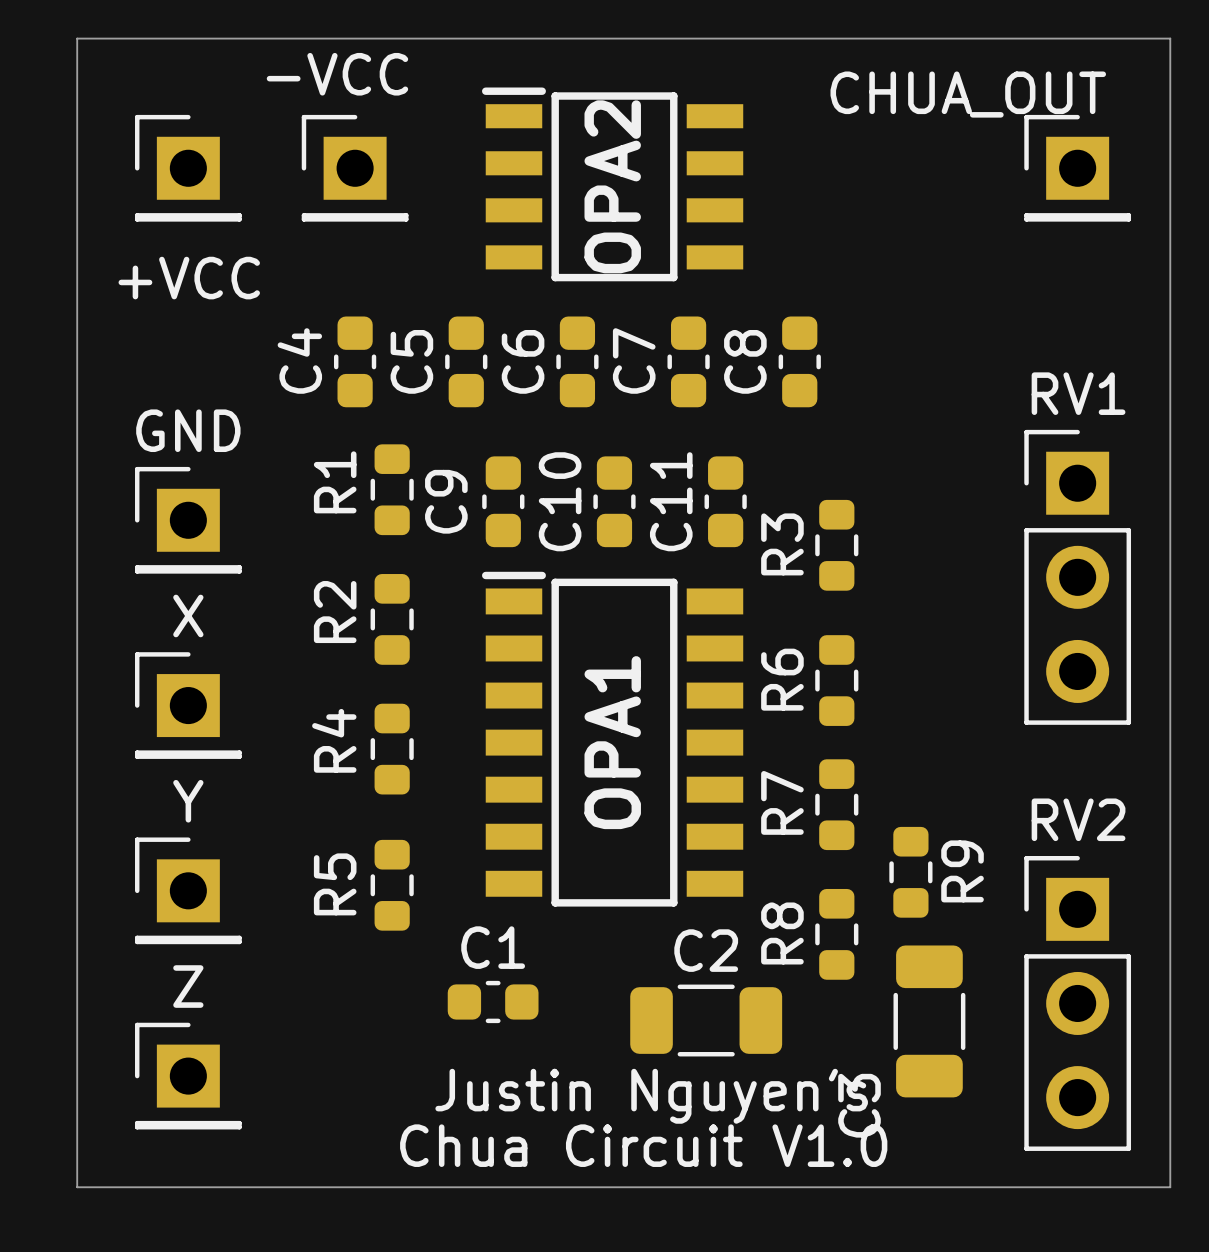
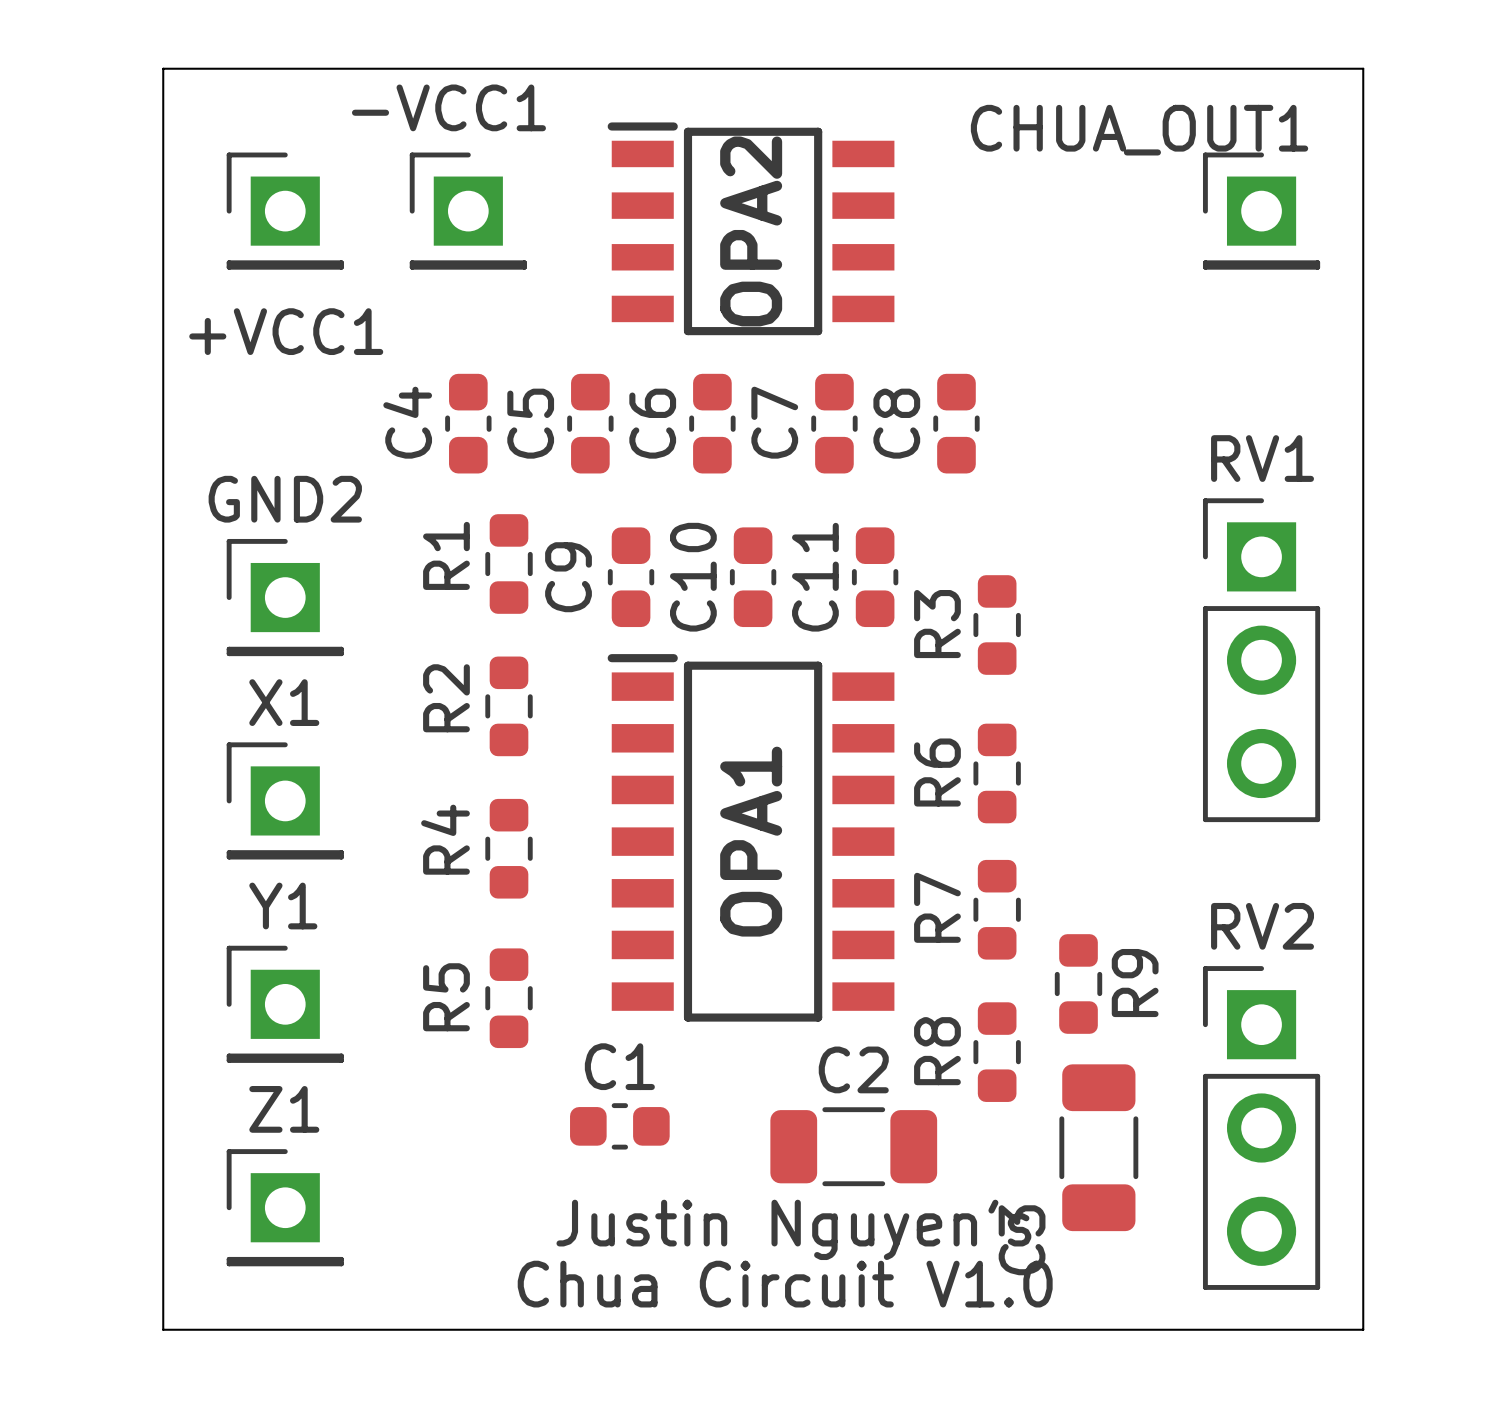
-VCC name: -VCC (337, 74) -> -VCC1 (448, 107)
CHUA_OUT name: CHUA_OUT (968, 94) -> CHUA_OUT1 (1139, 130)
+VCC name: +VCC (189, 278) -> +VCC1 (286, 331)
GND name: GND (188, 430) -> GND2 (285, 499)
X name: X (188, 615) -> X1 (284, 702)
Y name: Y (188, 801) -> Y1 (283, 906)
Z name: Z (188, 986) -> Z1 (284, 1109)

